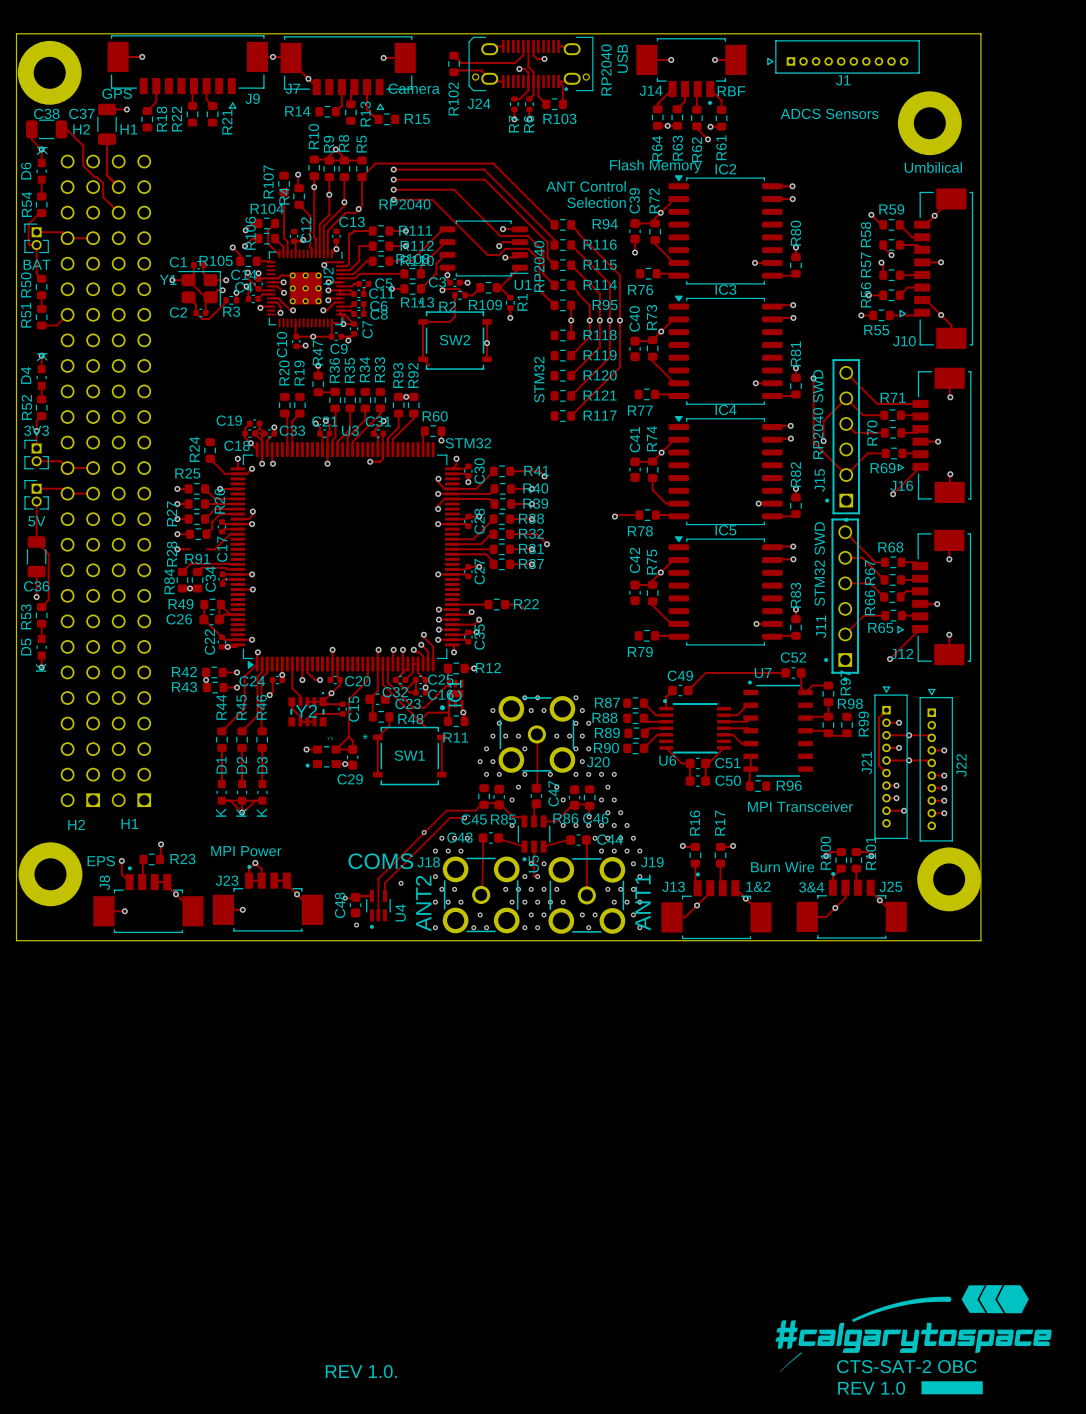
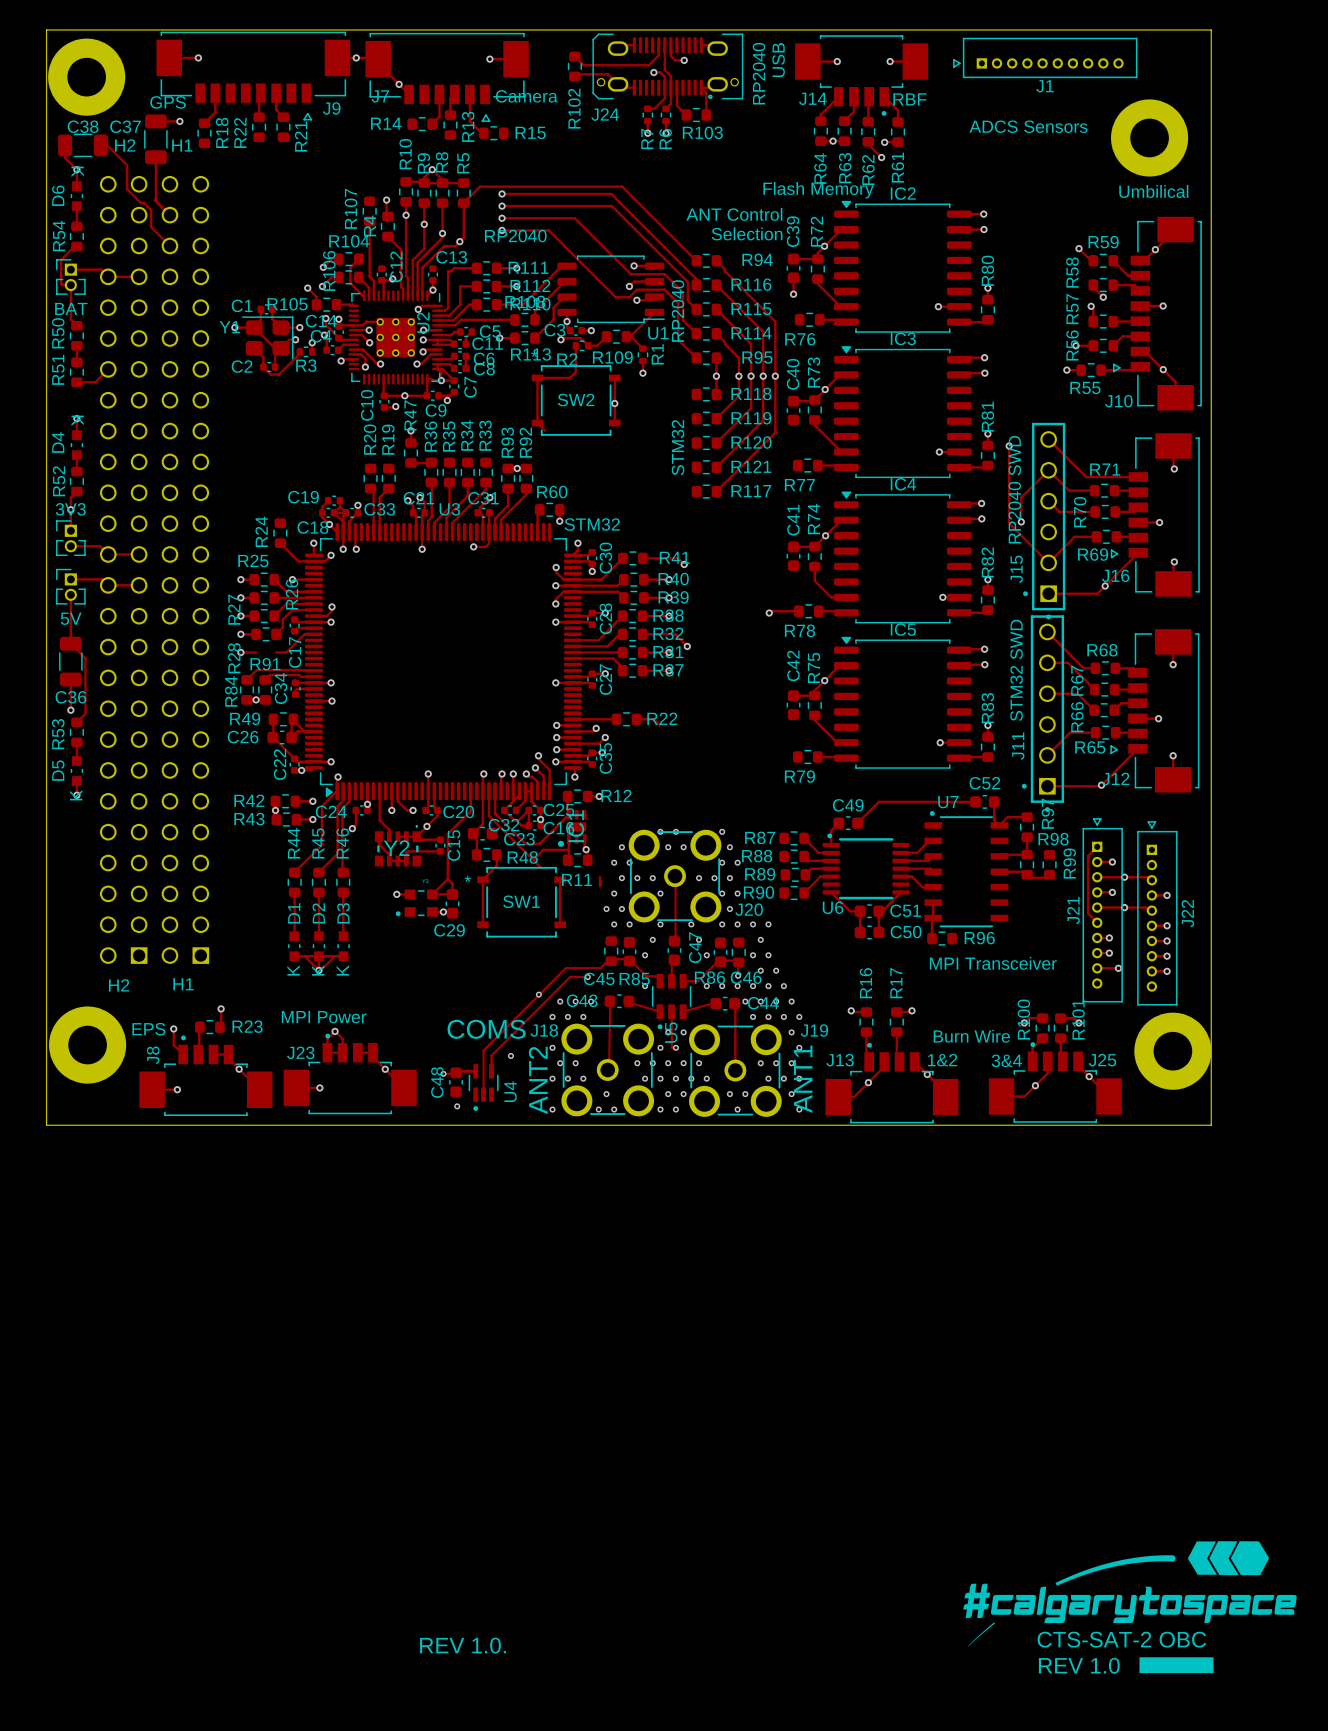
track: none -> (1105, 586) (1097, 593) (1048, 593)
track: none -> (1101, 785) (1047, 786)
via: none -> (614, 862)
track: none -> (600, 877) (600, 886)

